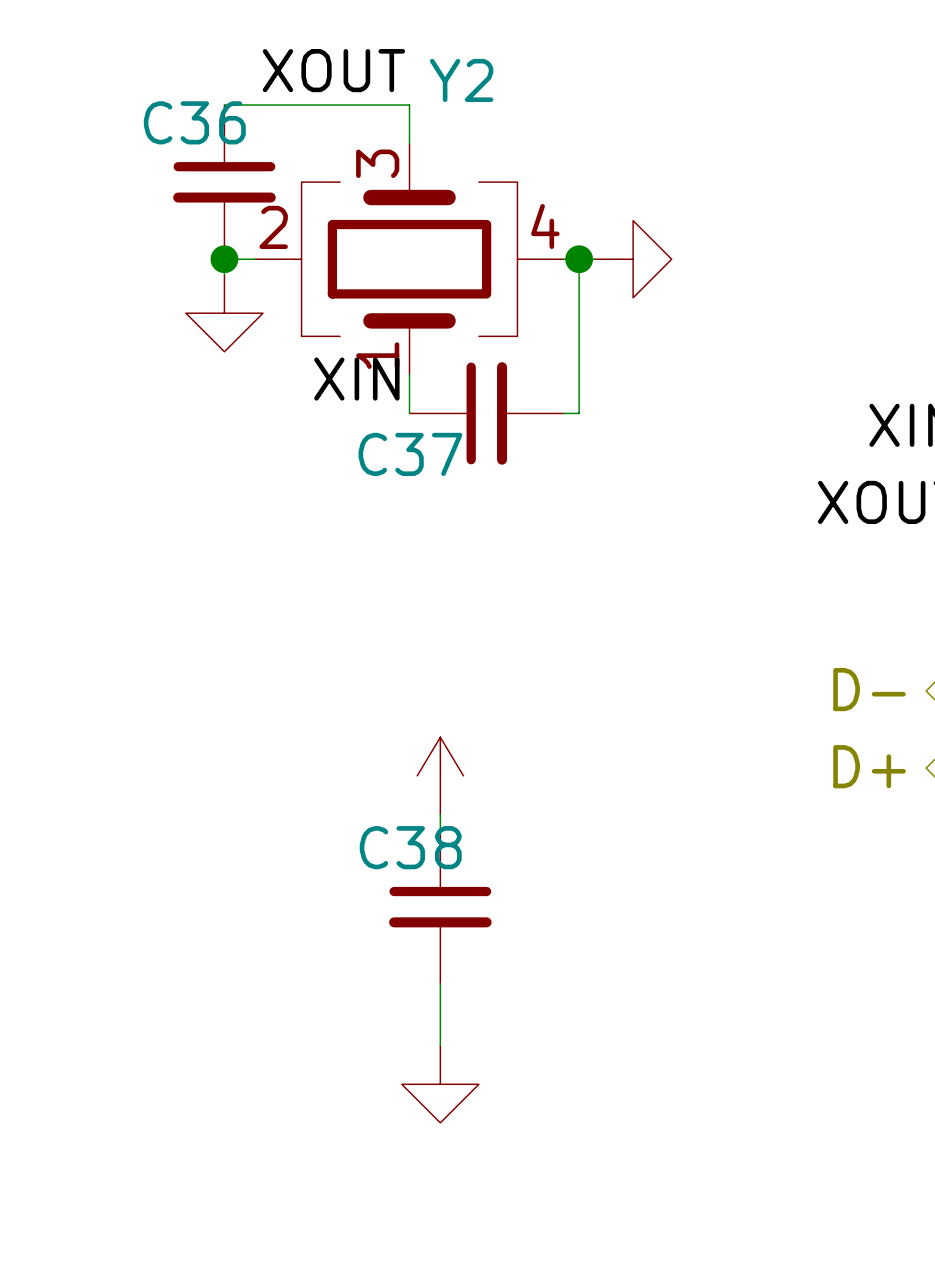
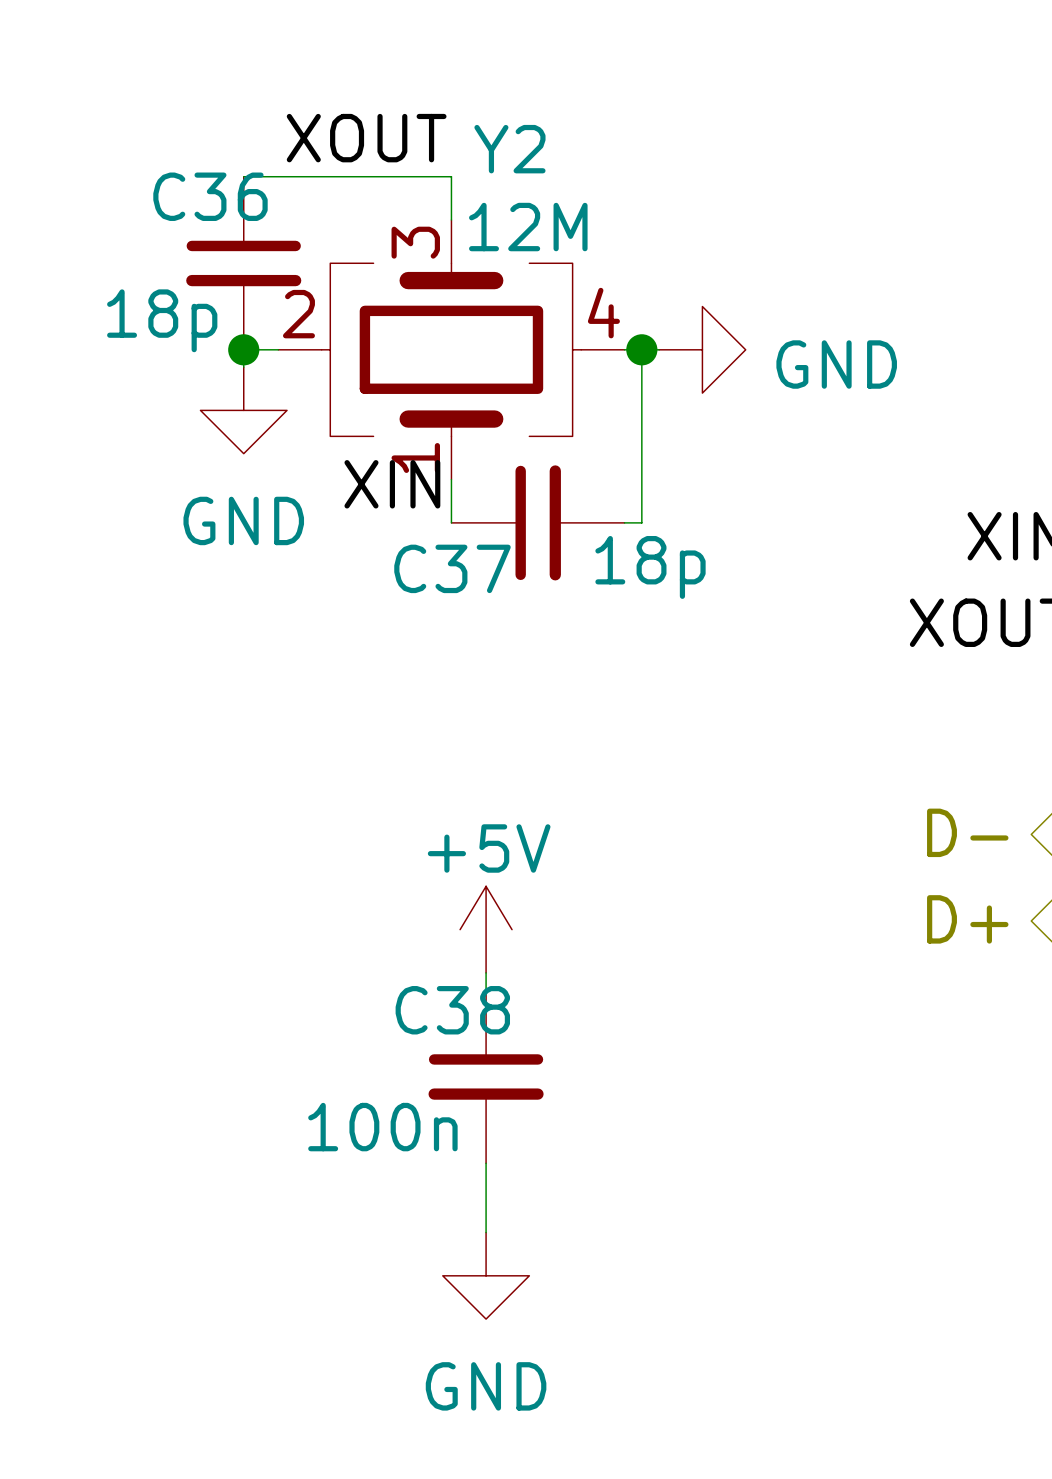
Y2 value: none -> 12M (528, 227)
C36 value: none -> 18p (162, 320)
power symbol text: none -> GND (836, 364)
power symbol text: none -> GND (243, 520)
C37 value: none -> 18p (650, 567)
power symbol text: none -> +5V (489, 848)
C38 value: none -> 100n (382, 1127)
power symbol text: none -> GND (486, 1386)

